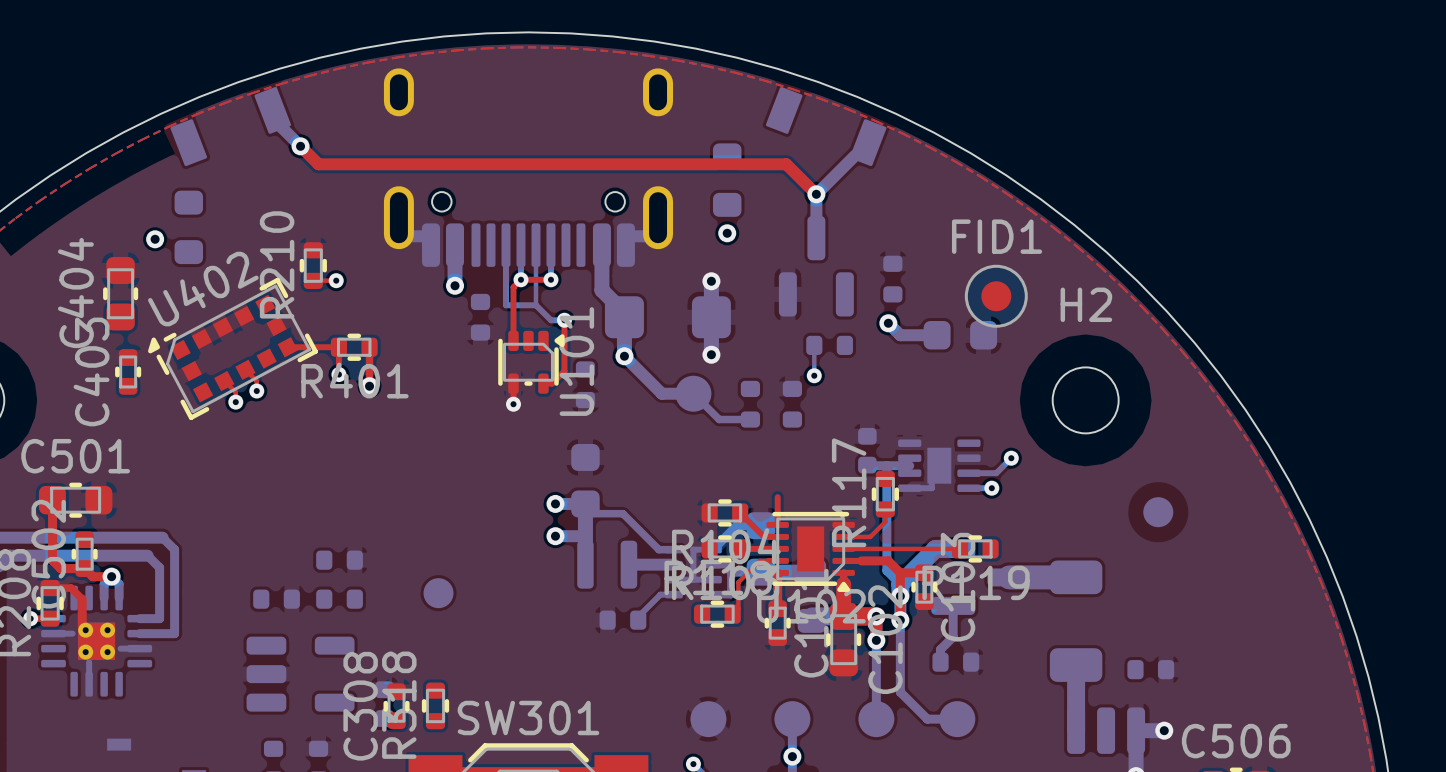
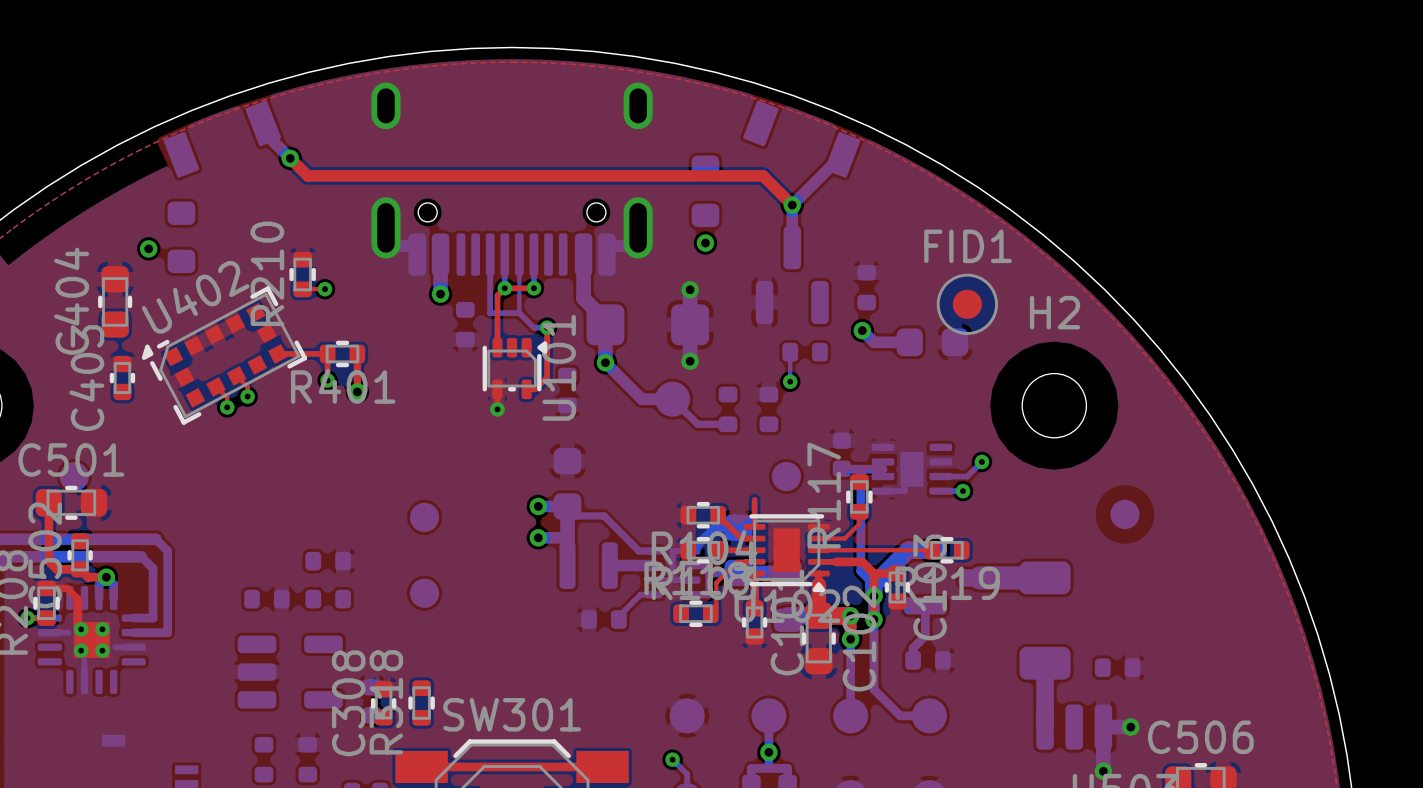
part: none -> (74, 476)
part: none -> (786, 476)
part: none -> (424, 517)

